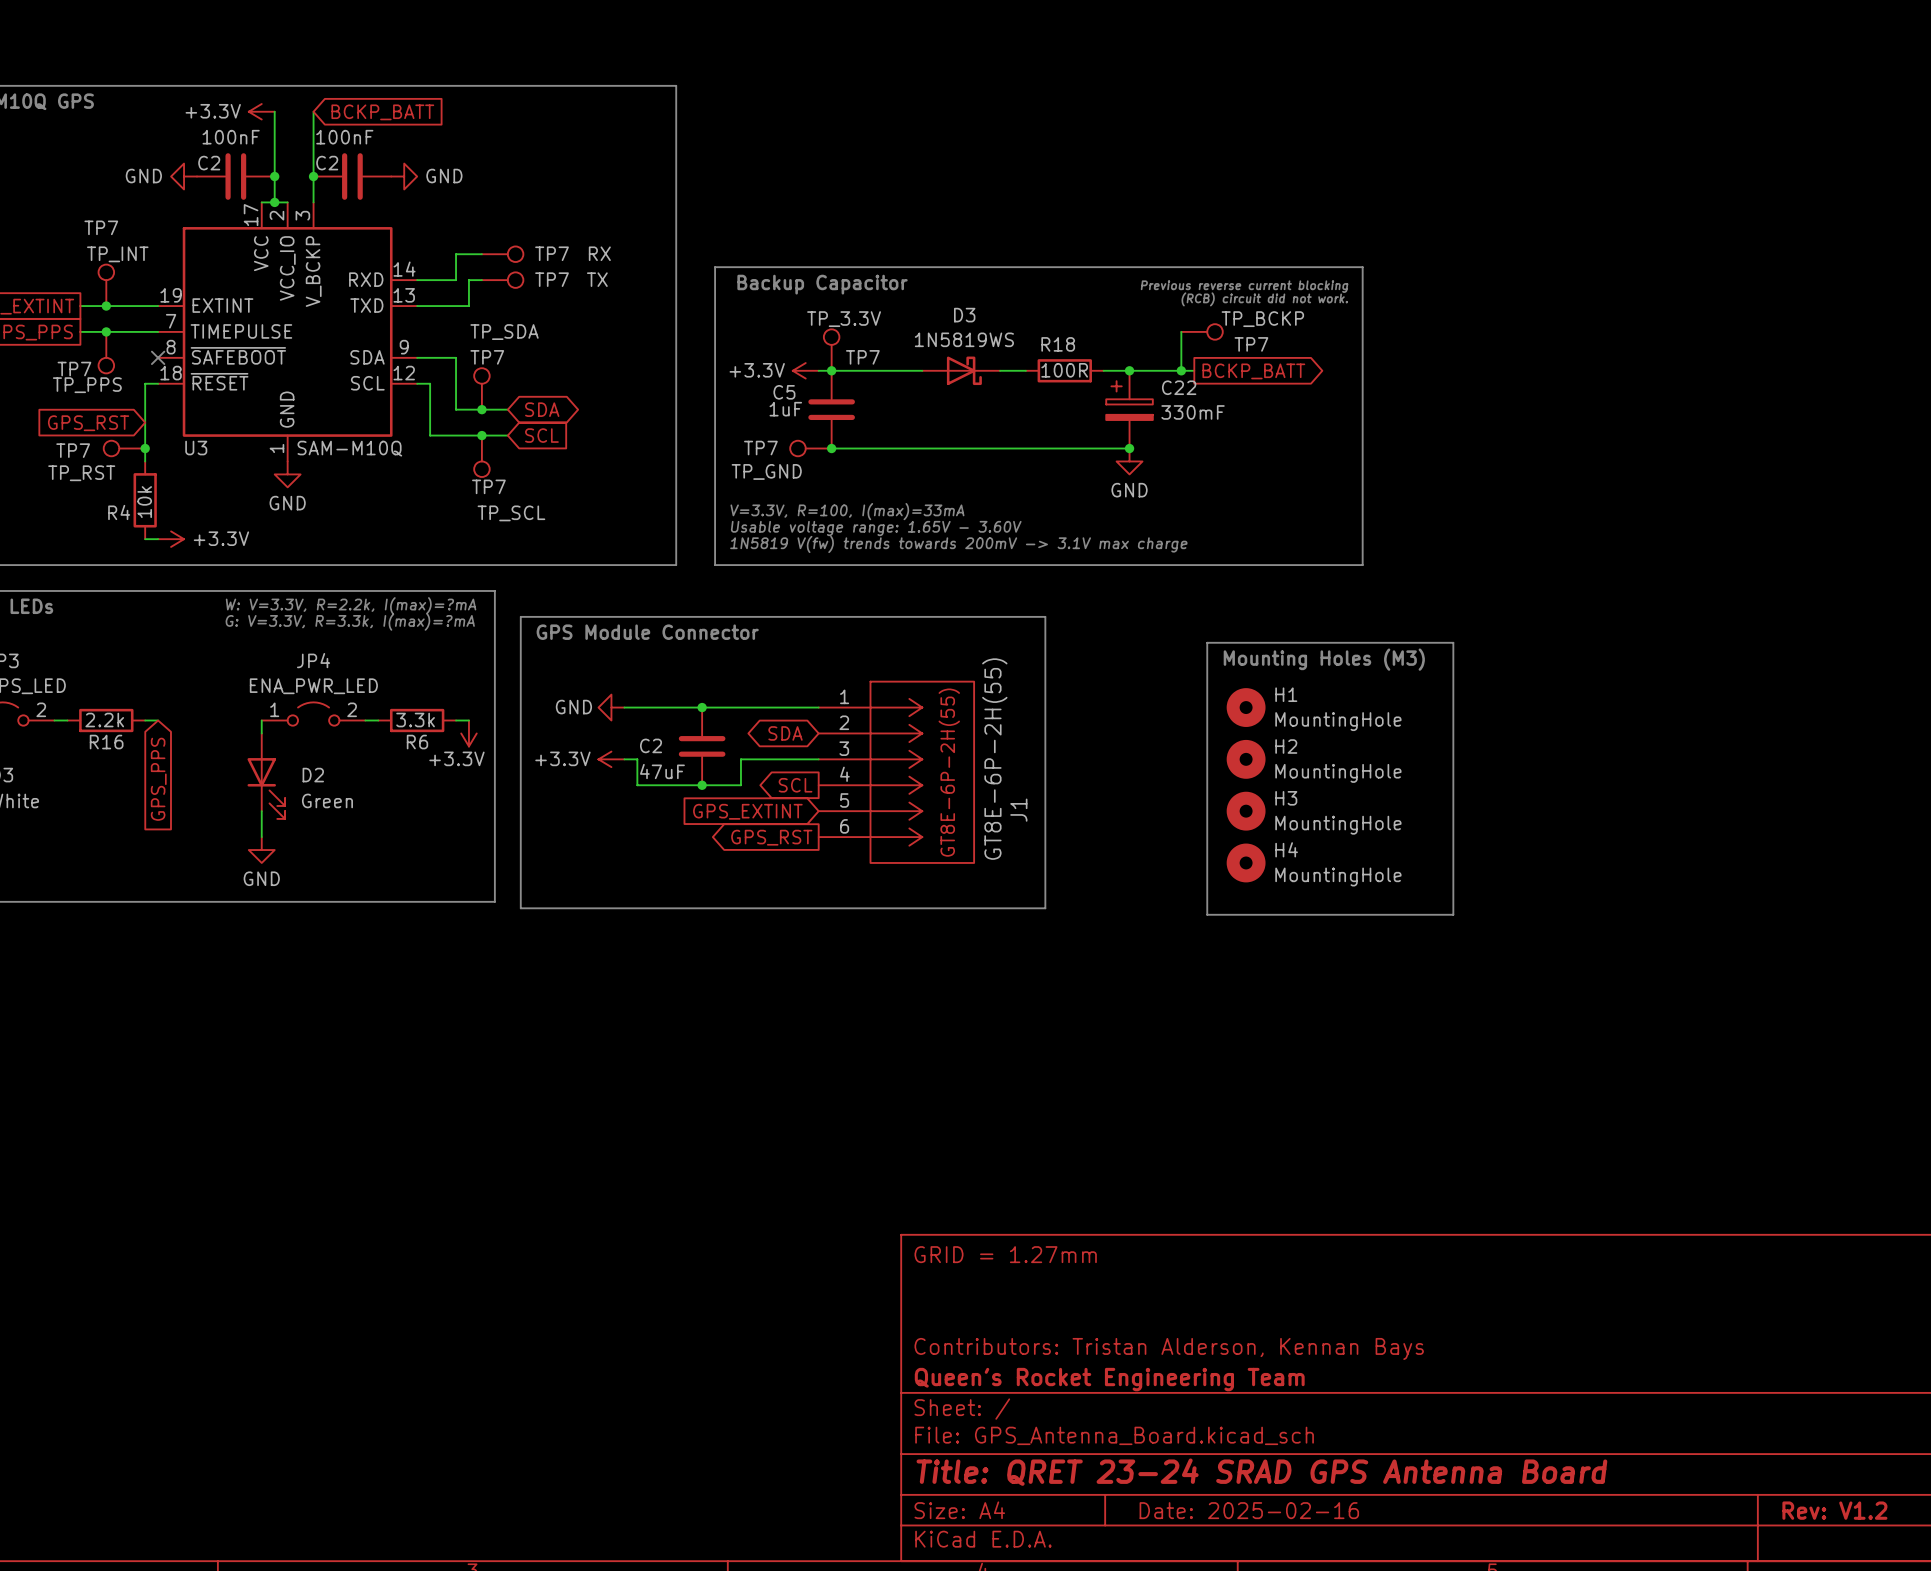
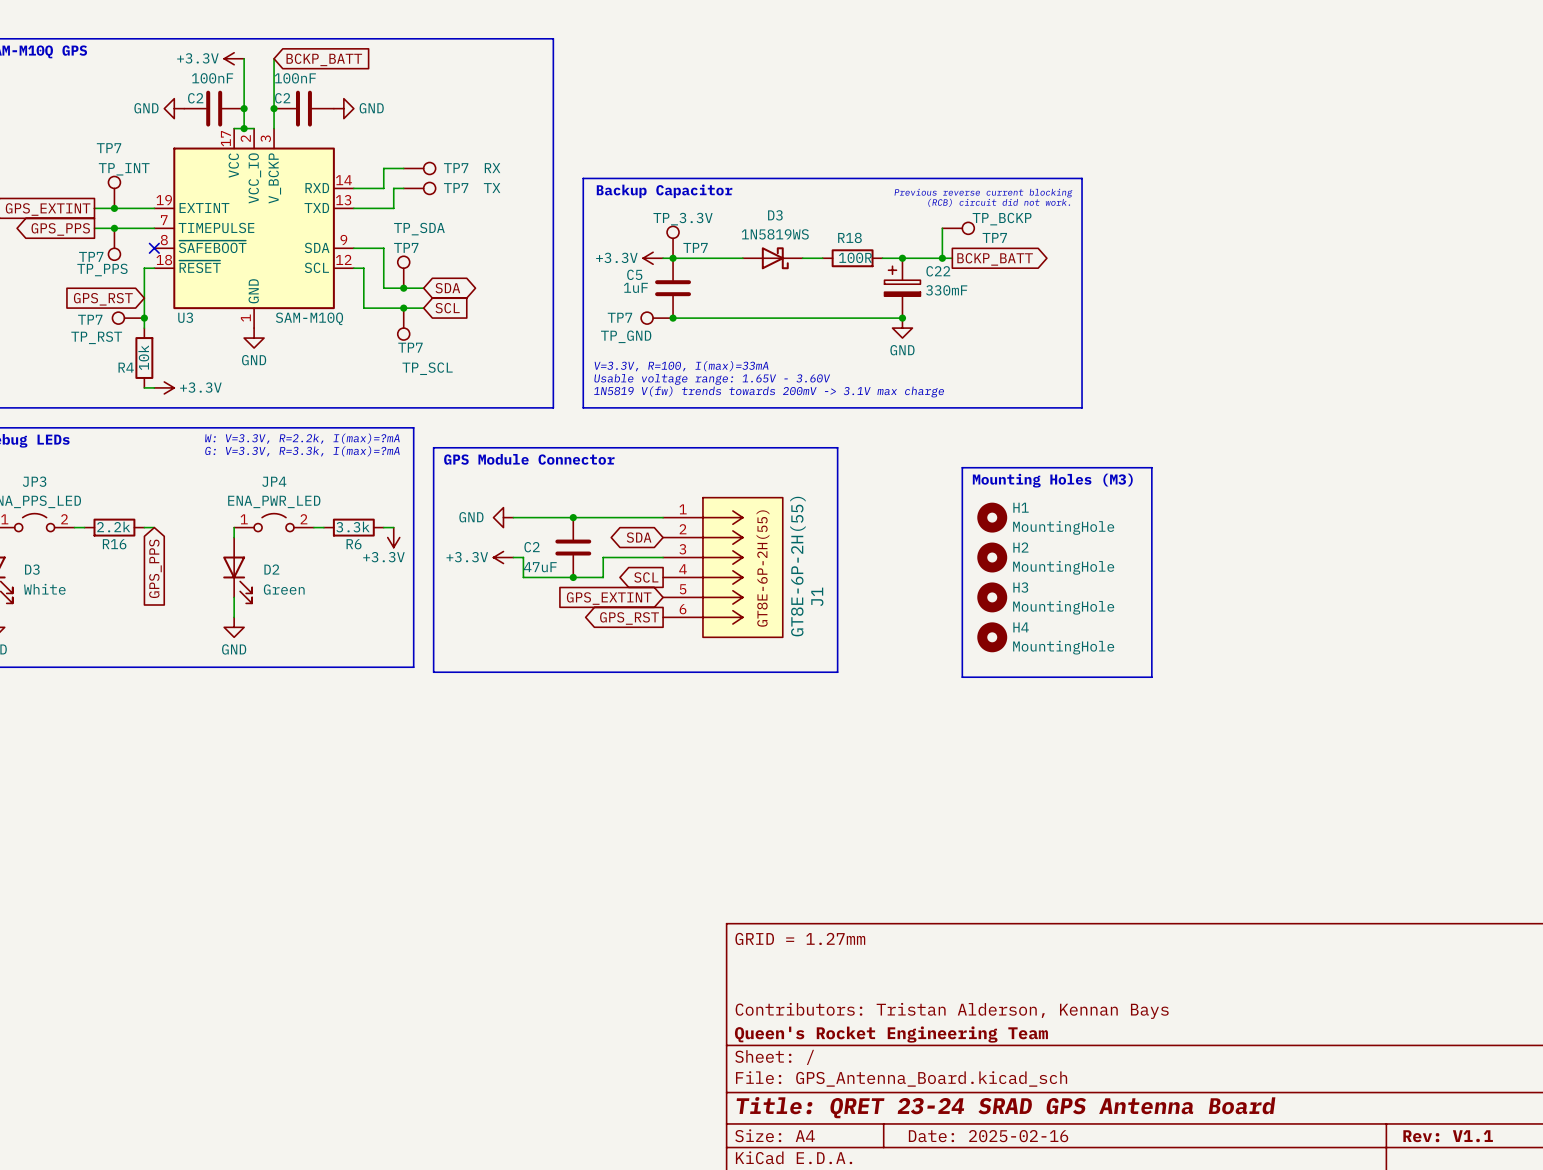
title block: Rev: V1.2 (1834, 1510) -> Rev: V1.1 (1448, 1136)

